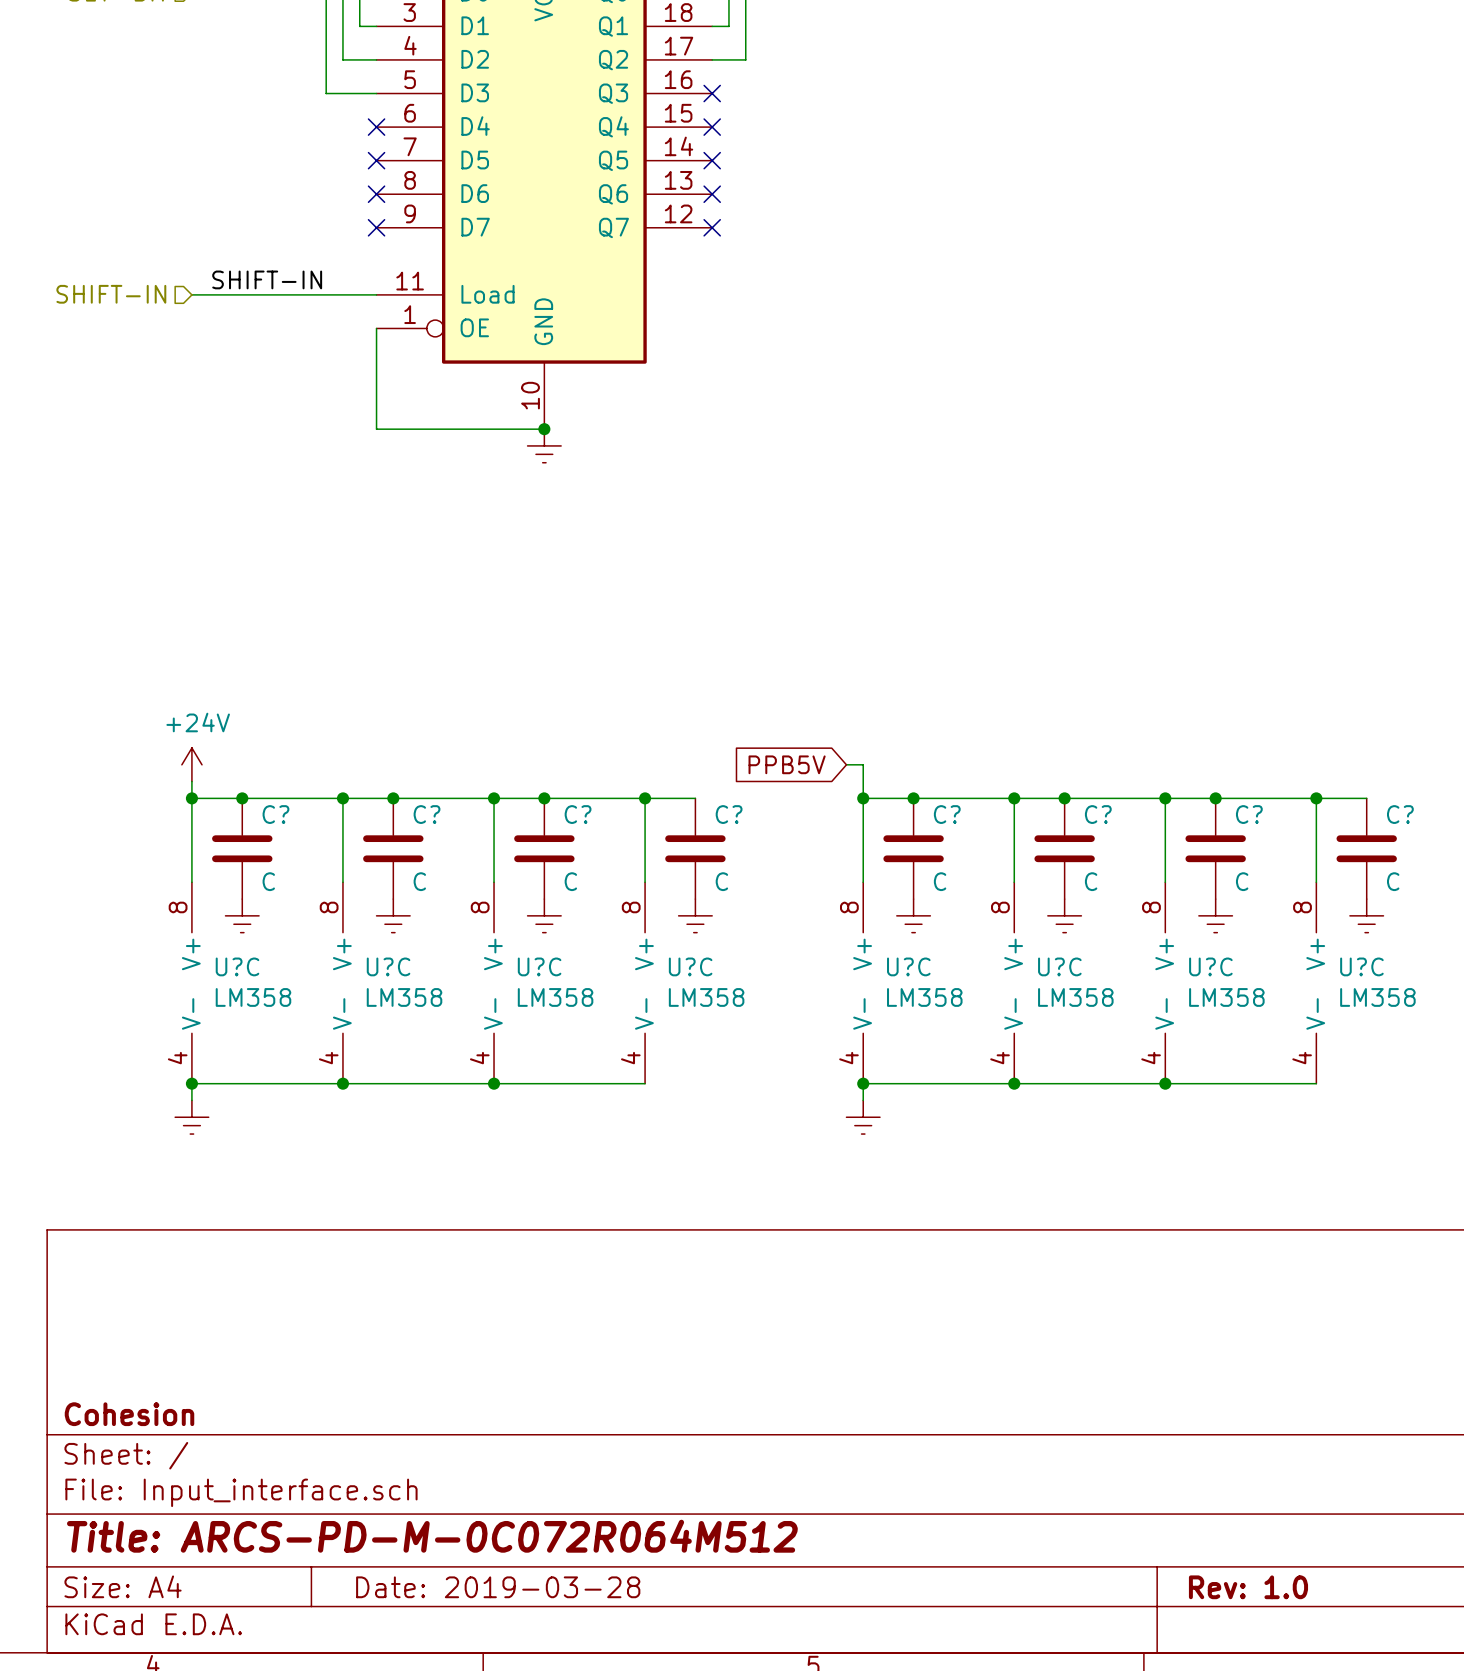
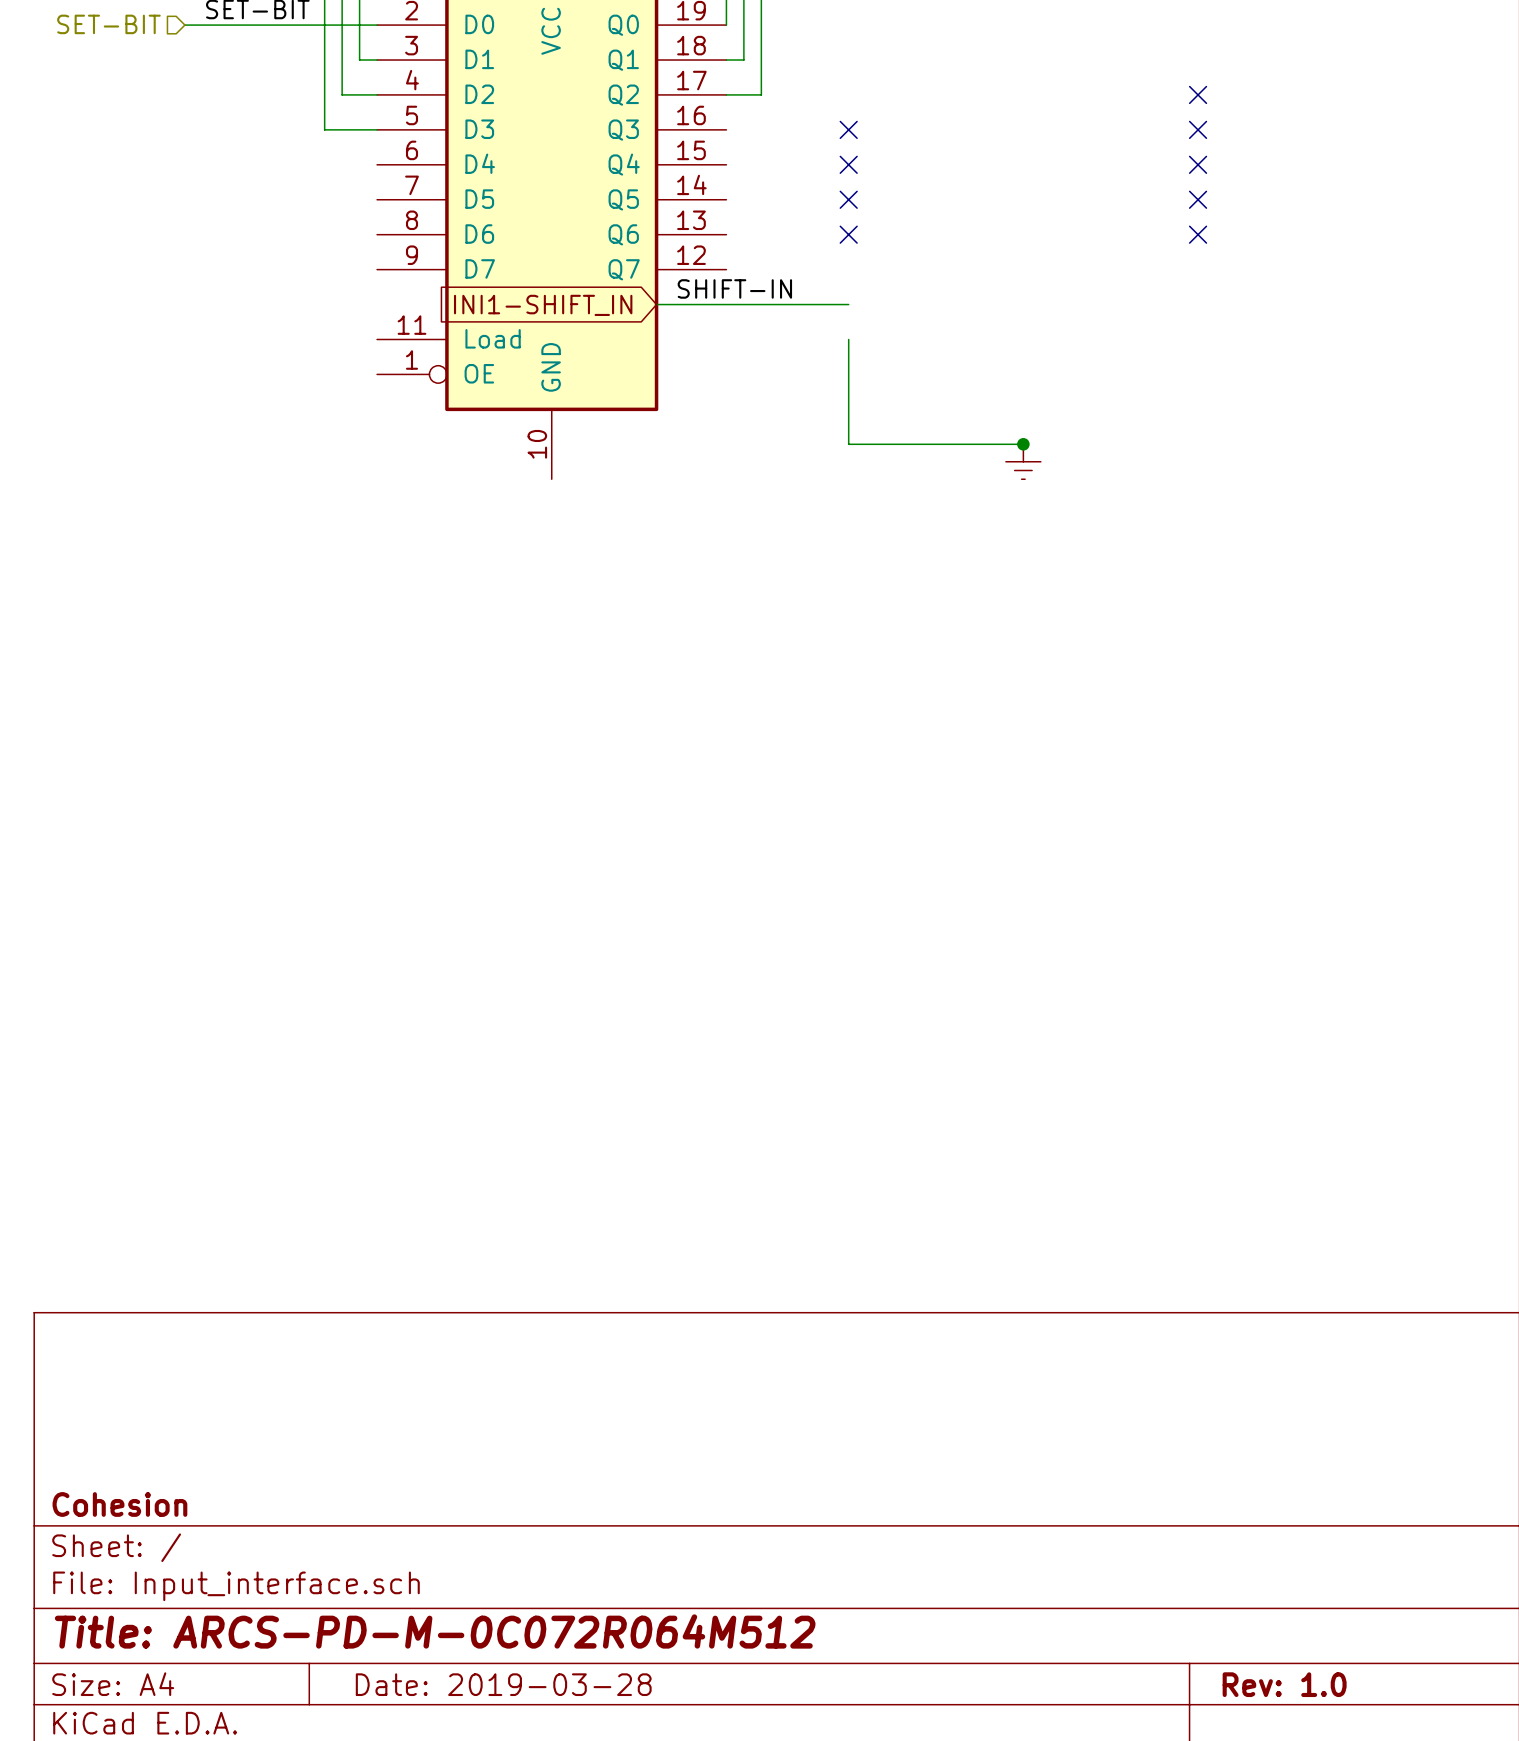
no-connect mark: none -> (1198, 94)
no-connect mark: (712, 93) -> none
no-connect mark: none -> (848, 129)
no-connect mark: none -> (1198, 129)
no-connect mark: (376, 127) -> none
no-connect mark: (712, 127) -> none
no-connect mark: none -> (848, 164)
no-connect mark: none -> (1198, 164)
no-connect mark: (376, 160) -> none
no-connect mark: (712, 160) -> none
no-connect mark: none -> (848, 199)
no-connect mark: none -> (1198, 199)
no-connect mark: (376, 194) -> none
no-connect mark: (712, 194) -> none
no-connect mark: none -> (848, 234)
no-connect mark: none -> (1198, 234)
no-connect mark: (376, 227) -> none
no-connect mark: (712, 227) -> none
label: none -> SHIFT-IN (734, 288)
wire: none -> (656, 304) (848, 304)
global label: none -> INI1-SHIFT_IN (543, 305)
label: SHIFT-IN (267, 279) -> none
hierarchical label: SHIFT-IN (111, 294) -> none
wire: (191, 294) (376, 294) -> none
wire: none -> (848, 339) (848, 444) (1023, 444)
wire: (376, 328) (376, 429) (544, 429) -> none
junction: none -> (1023, 444)
power symbol: none -> (1023, 461)
junction: (544, 429) -> none
power symbol: (544, 445) -> none
power symbol: +24V (191, 764) -> none
global label: PPB5V (787, 764) -> none
wire: (846, 764) (863, 764) (863, 882) -> none
wire: (191, 781) (191, 882) -> none
wire: (191, 798) (695, 798) -> none
junction: (191, 798) -> none
junction: (242, 798) -> none
wire: (342, 798) (342, 882) -> none
junction: (342, 798) -> none
junction: (393, 798) -> none
wire: (494, 798) (494, 882) -> none
junction: (494, 798) -> none
junction: (544, 798) -> none
wire: (645, 798) (645, 882) -> none
junction: (645, 798) -> none
wire: (863, 798) (1366, 798) -> none
junction: (863, 798) -> none
junction: (913, 798) -> none
wire: (1014, 798) (1014, 882) -> none
junction: (1014, 798) -> none
junction: (1064, 798) -> none
wire: (1165, 798) (1165, 882) -> none
junction: (1165, 798) -> none
junction: (1215, 798) -> none
wire: (1316, 798) (1316, 882) -> none
junction: (1316, 798) -> none
C?: C (242, 848) -> none
C?: C (393, 848) -> none
C?: C (544, 848) -> none
C?: C (695, 848) -> none
C?: C (913, 848) -> none
C?: C (1064, 848) -> none
C?: C (1215, 848) -> none
C?: C (1366, 848) -> none
power symbol: (242, 915) -> none
power symbol: (393, 915) -> none
power symbol: (544, 915) -> none
power symbol: (695, 915) -> none
power symbol: (913, 915) -> none
power symbol: (1064, 915) -> none
power symbol: (1215, 915) -> none
power symbol: (1366, 915) -> none
U?C: LM358 (191, 982) -> none
U?C: LM358 (342, 982) -> none
U?C: LM358 (494, 982) -> none
U?C: LM358 (645, 982) -> none
U?C: LM358 (863, 982) -> none
U?C: LM358 (1014, 982) -> none
U?C: LM358 (1165, 982) -> none
U?C: LM358 (1316, 982) -> none
junction: (191, 1083) -> none
junction: (342, 1083) -> none
junction: (494, 1083) -> none
wire: (645, 1083) (191, 1083) (191, 1100) -> none
junction: (863, 1083) -> none
junction: (1014, 1083) -> none
junction: (1165, 1083) -> none
wire: (1316, 1083) (863, 1083) (863, 1100) -> none
power symbol: (191, 1117) -> none
power symbol: (863, 1117) -> none

